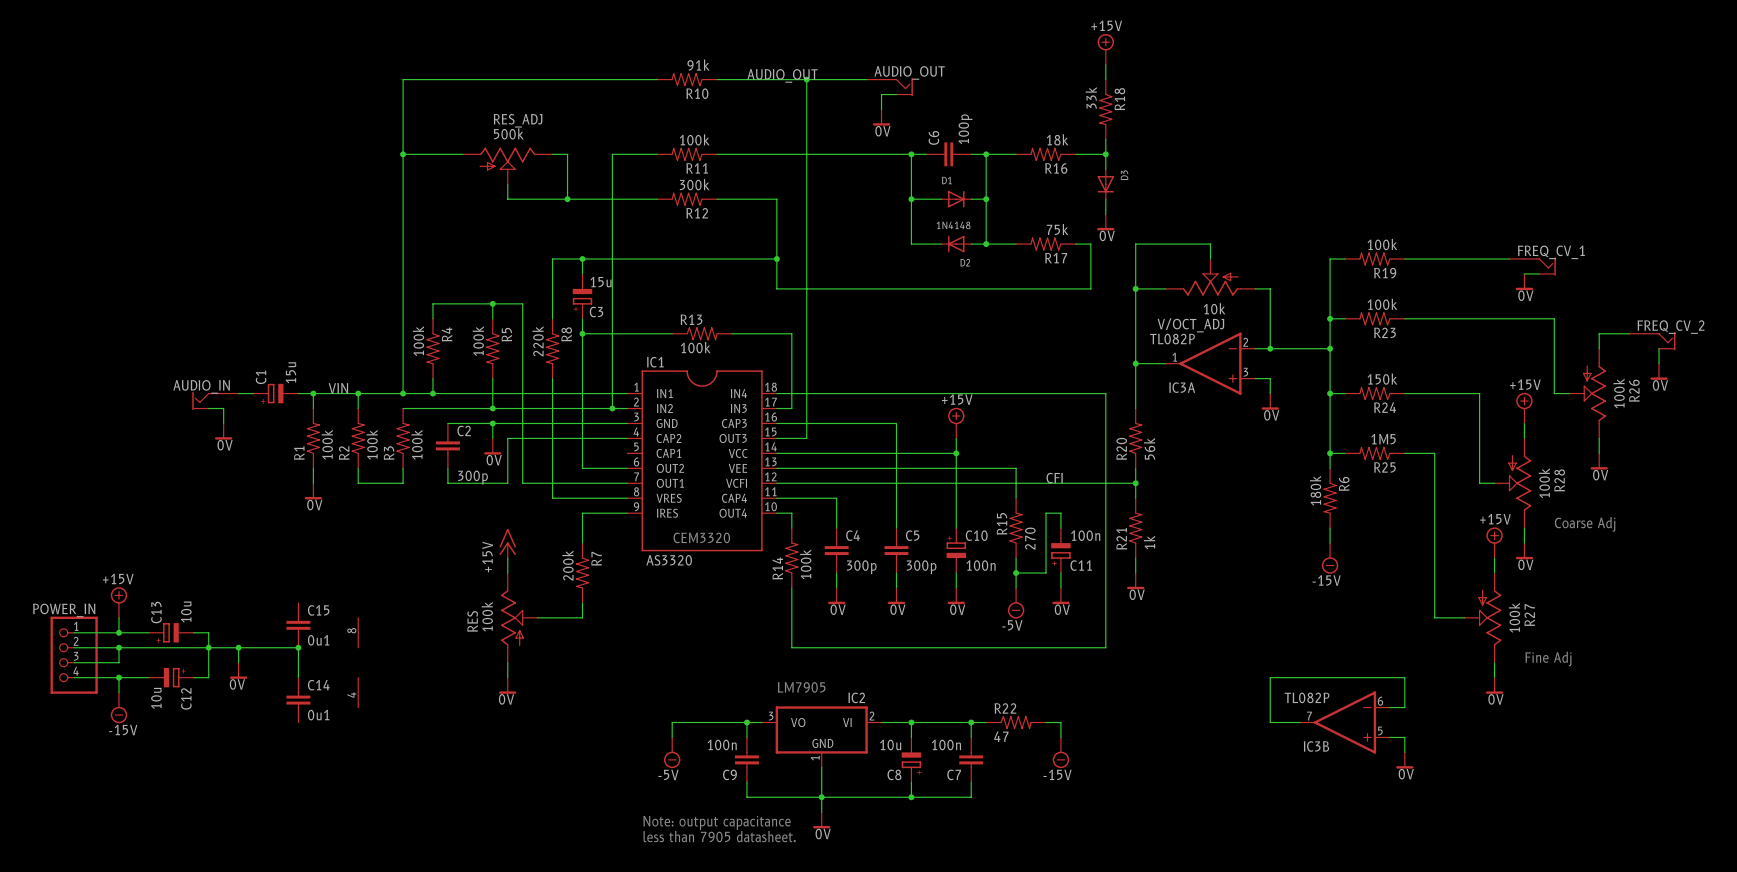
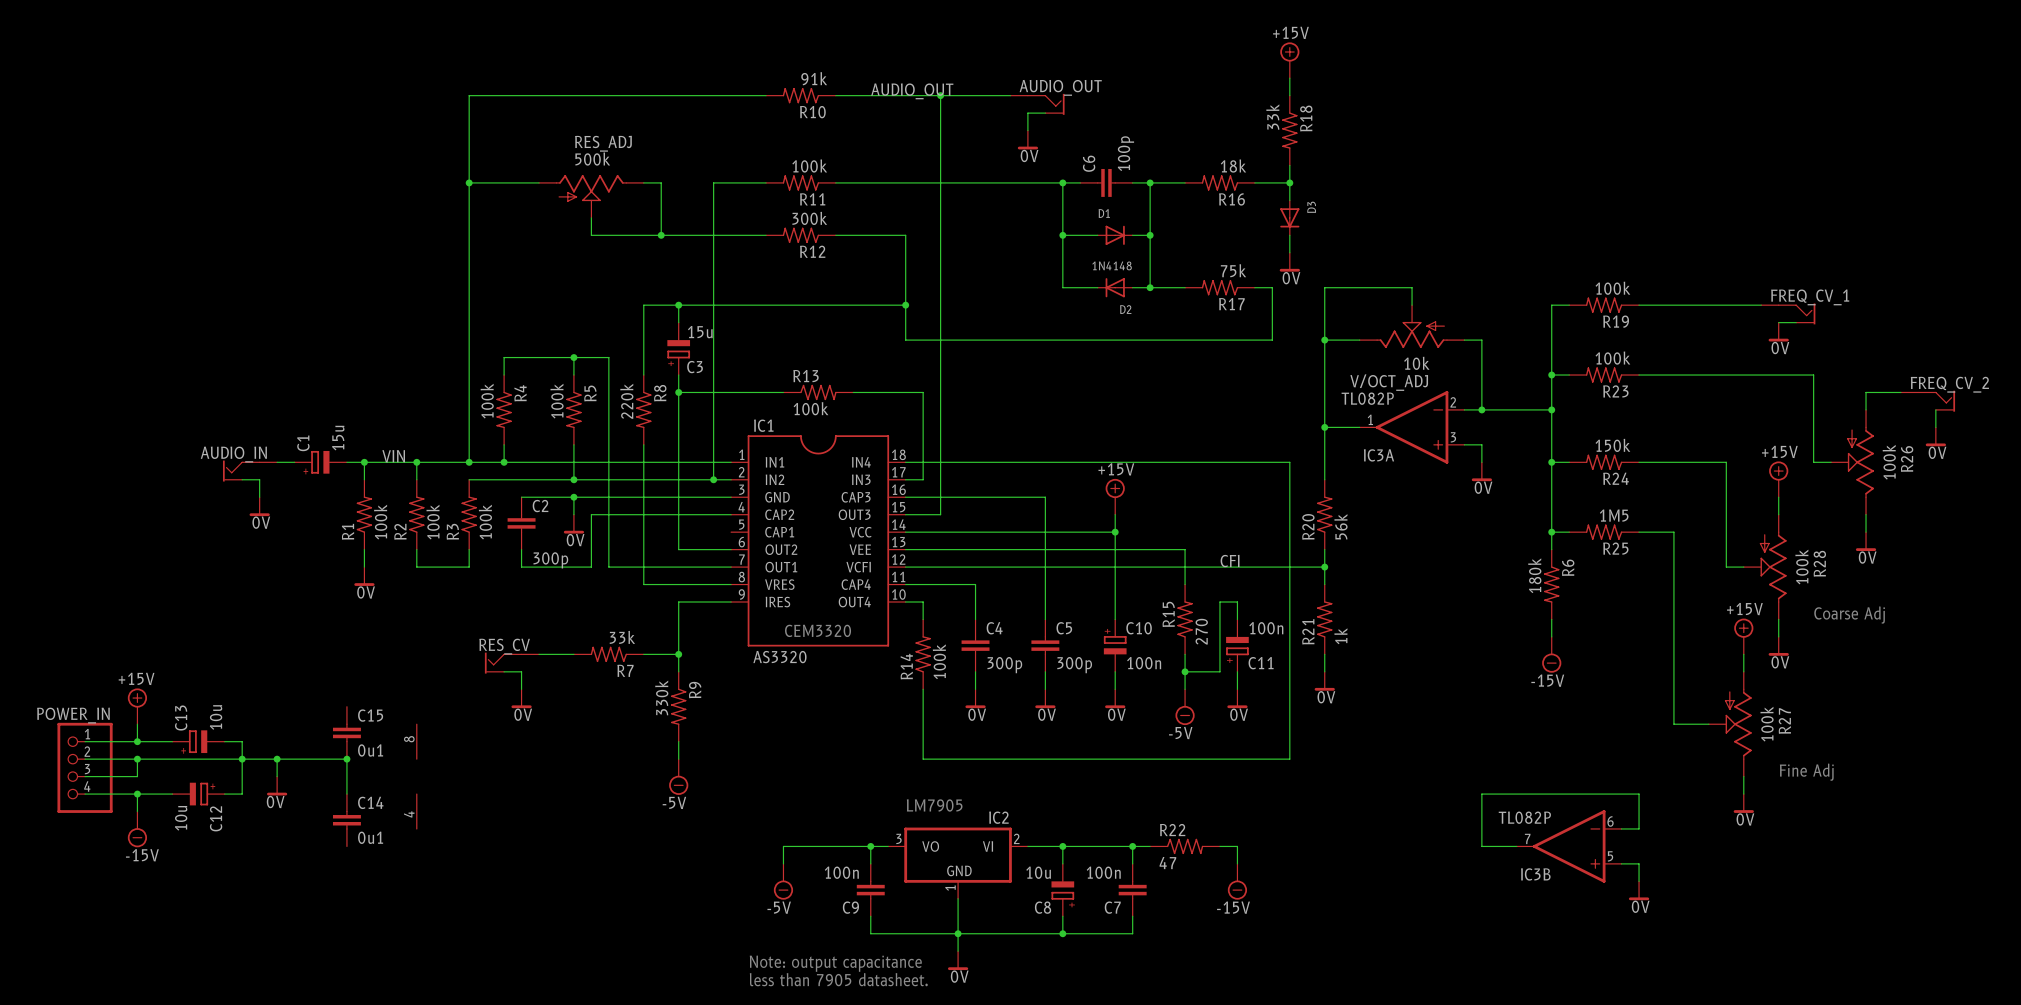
power symbol: +15V (507, 543) -> none
wire: none -> (539, 654) (573, 654)
wire: (507, 558) (507, 572) -> none
wire: none -> (643, 654) (678, 654)
junction: none -> (678, 654)
RES_CV: none -> (511, 663)
R7 value: 200k (568, 565) -> 33k (622, 637)
wire: none -> (504, 671) (521, 671) (521, 689)
R7 rotation: 0° (582, 572) -> 90° clockwise (608, 654)
R7 position: (582, 572) -> (608, 654)
wire: (582, 602) (582, 617) (537, 617) -> none
R9: none -> 330k (678, 706)
RES: 100k (519, 617) -> none
wire: (507, 662) (507, 677) -> (678, 741) (678, 759)
power symbol: none -> -5V (678, 777)
power symbol position: 0V (507, 685) -> 0V (521, 698)
power symbol text position: 0V (506, 699) -> 0V (523, 714)

